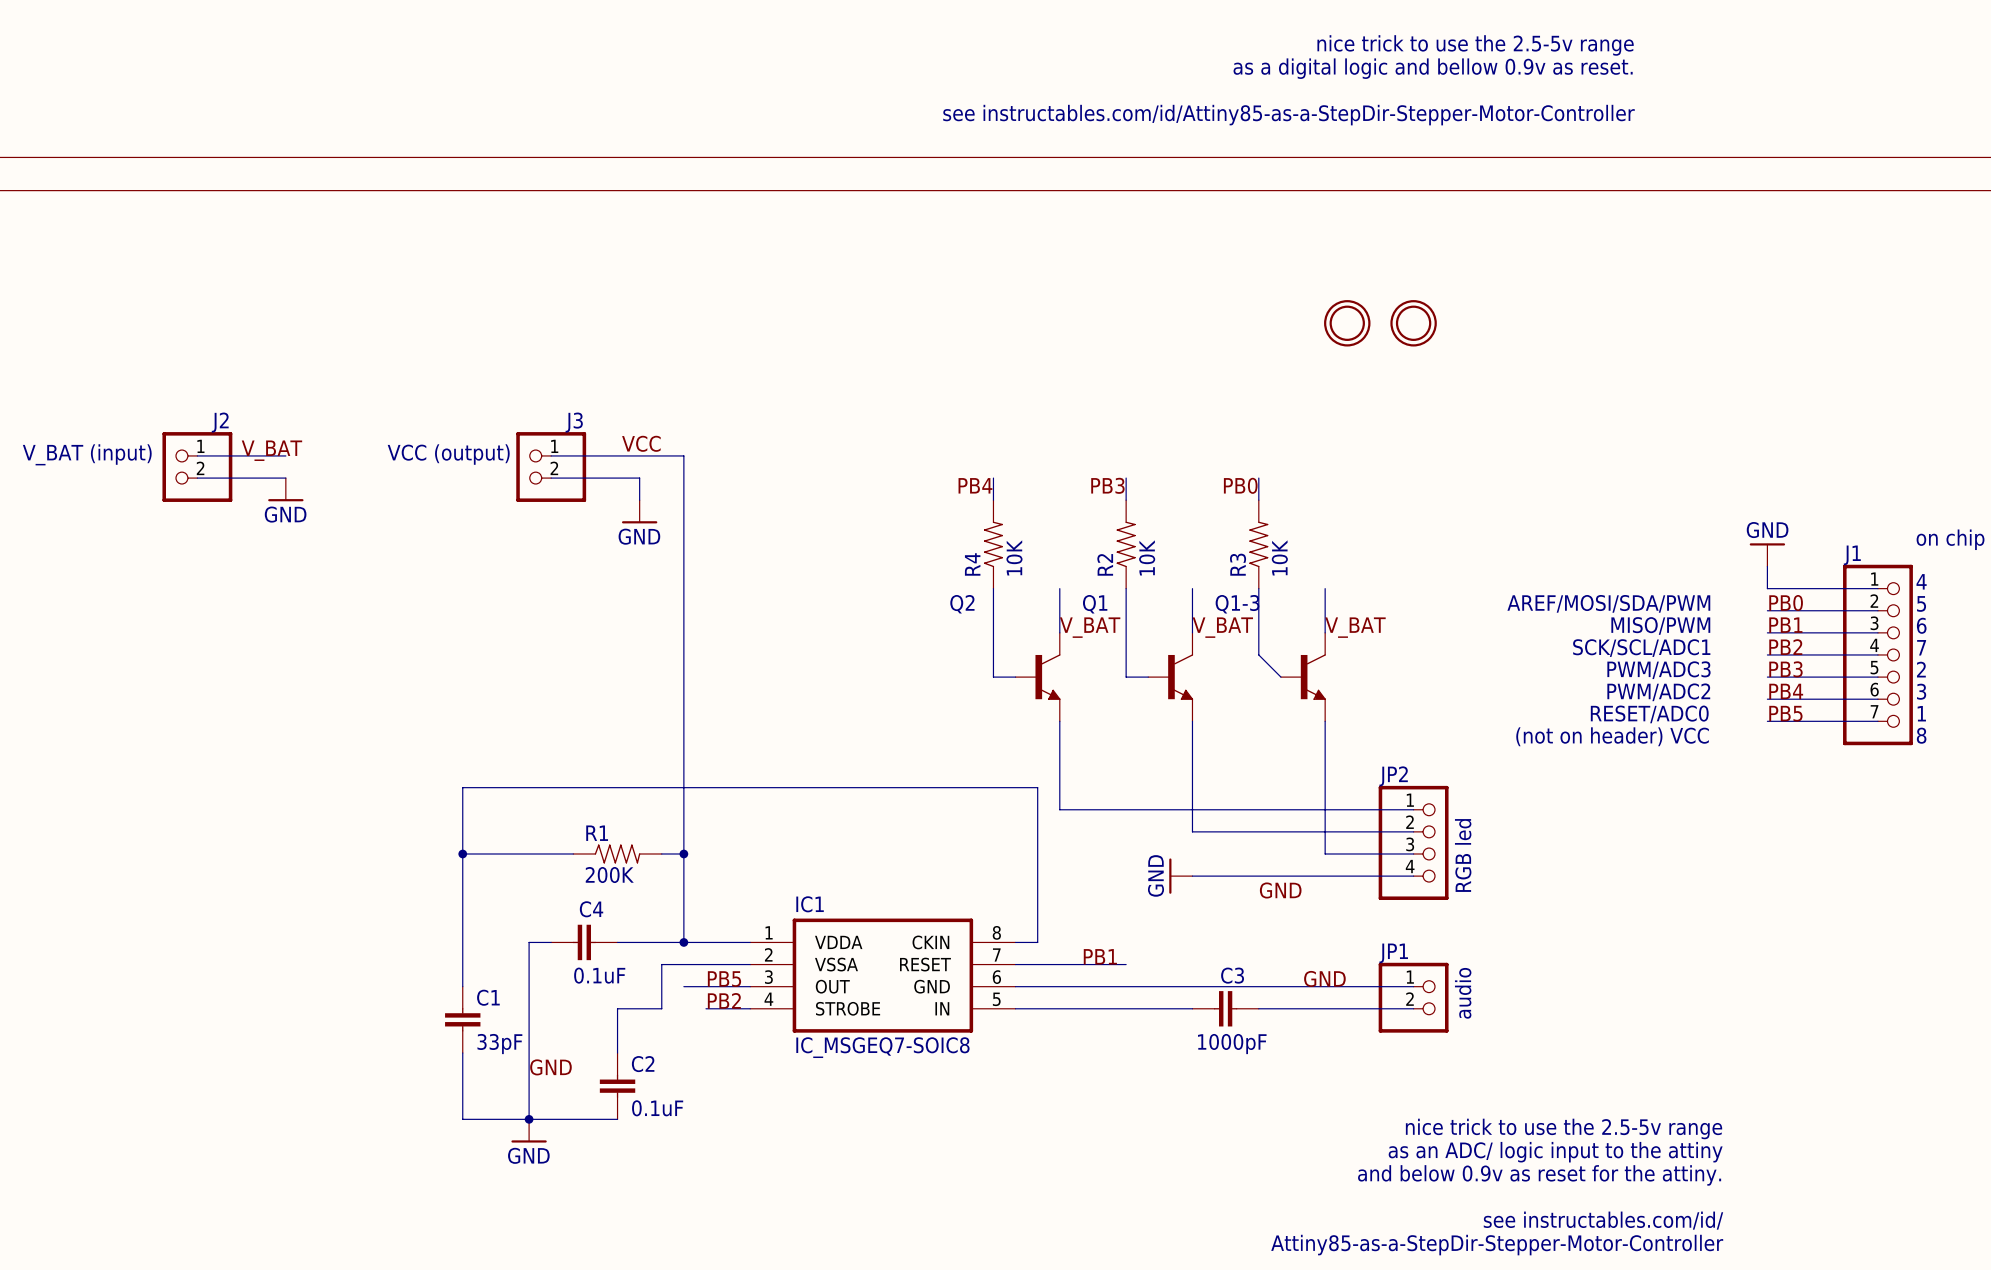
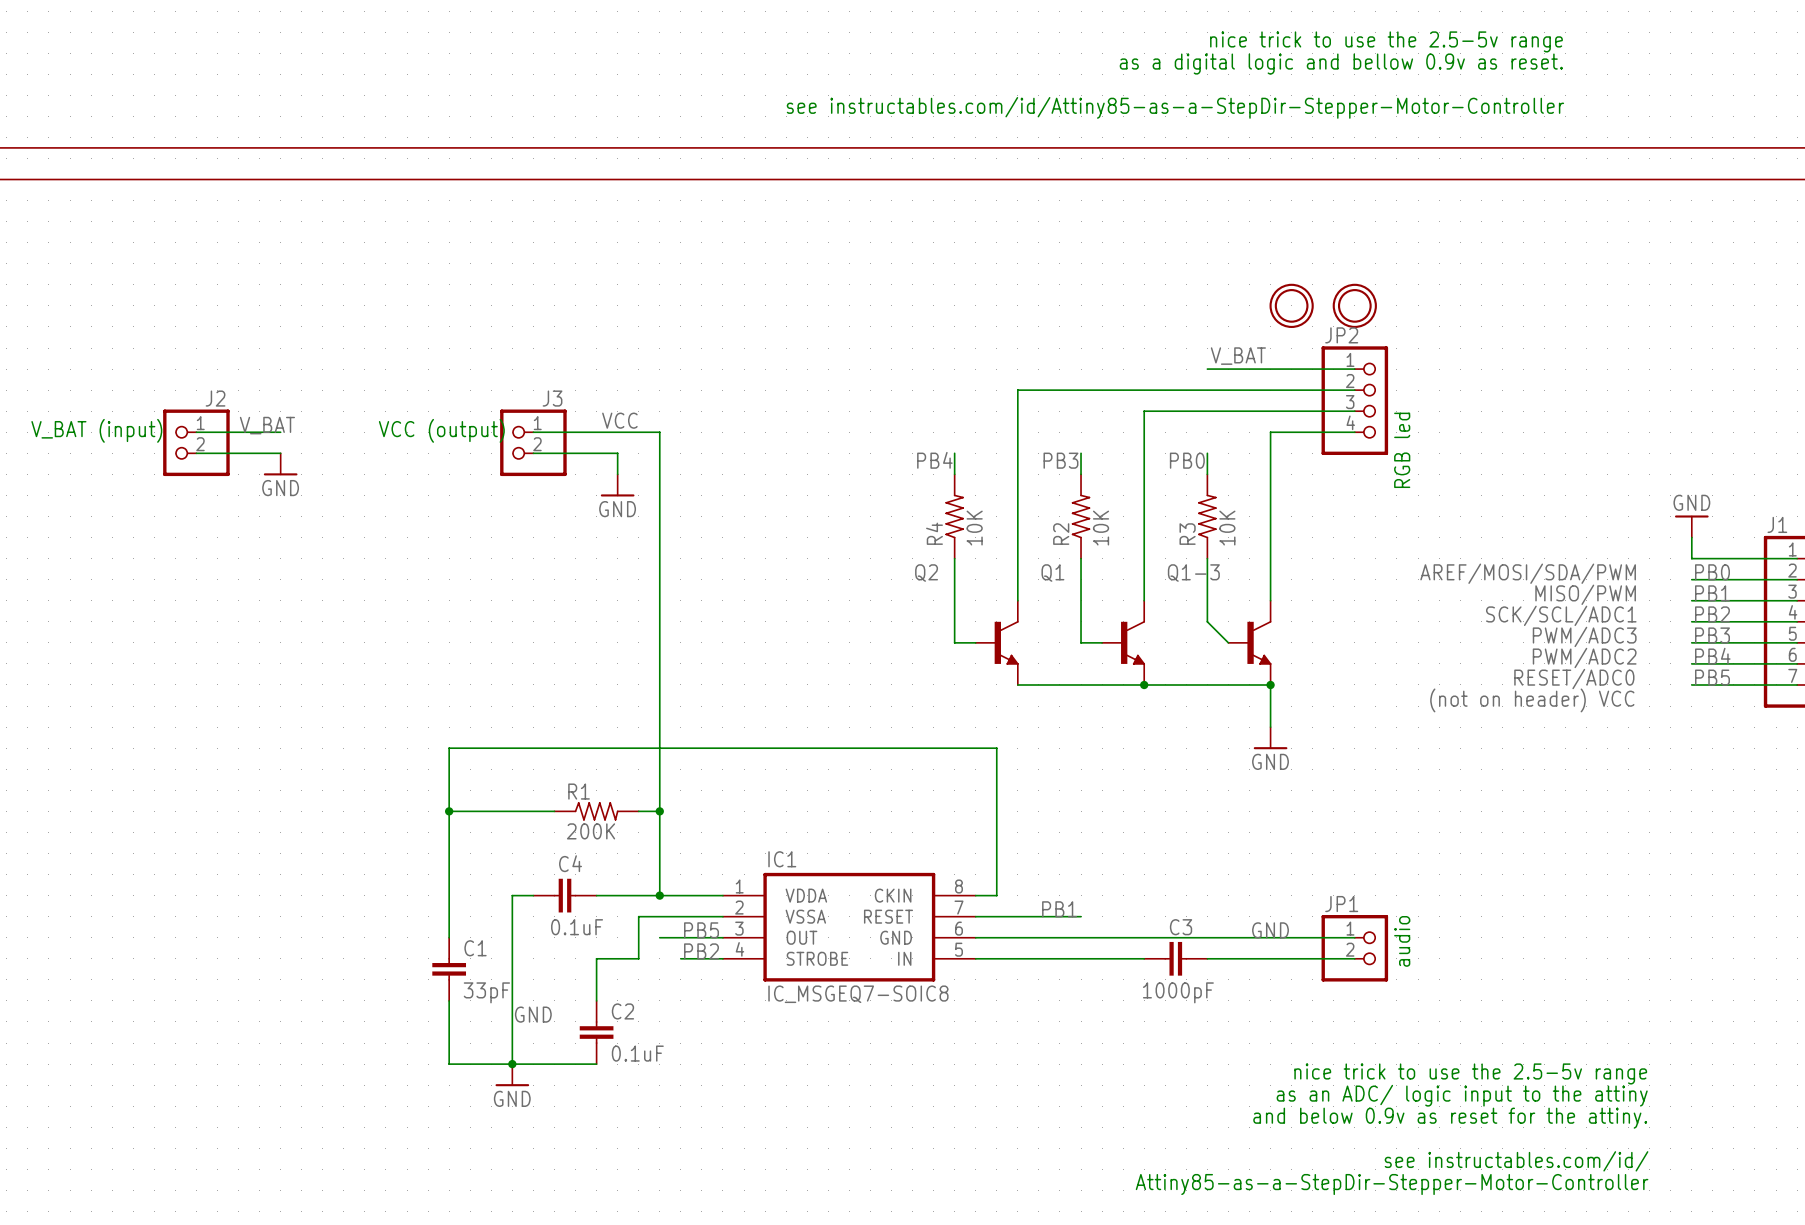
label: none -> V_BAT (1238, 356)
wire: none -> (1207, 369) (1354, 369)
wire: none -> (1354, 390) (1017, 390) (1017, 558)
wire: none -> (1354, 411) (1144, 411) (1144, 558)
wire: none -> (1354, 432) (1270, 432) (1270, 558)
text: none -> RGB led (1402, 450)
label: V_BAT (1090, 627) -> none
label: V_BAT (1222, 627) -> none
label: V_BAT (1355, 627) -> none
wire: (1059, 721) (1059, 809) (1413, 809) -> (1017, 684) (1270, 684)
wire: (1192, 721) (1192, 831) (1413, 831) -> none
junction: none -> (1144, 684)
junction: none -> (1270, 684)
wire: (1325, 765) (1325, 853) (1413, 853) -> none
JP2 position: (1413, 842) -> (1354, 400)
text: RGB led (1463, 855) -> none
power symbol rotation: 0° (1170, 876) -> 90° counterclockwise (1270, 748)
power symbol position: GND (1180, 876) -> GND (1270, 738)
wire: (1192, 876) (1413, 876) -> none
label: GND (1280, 890) -> none

